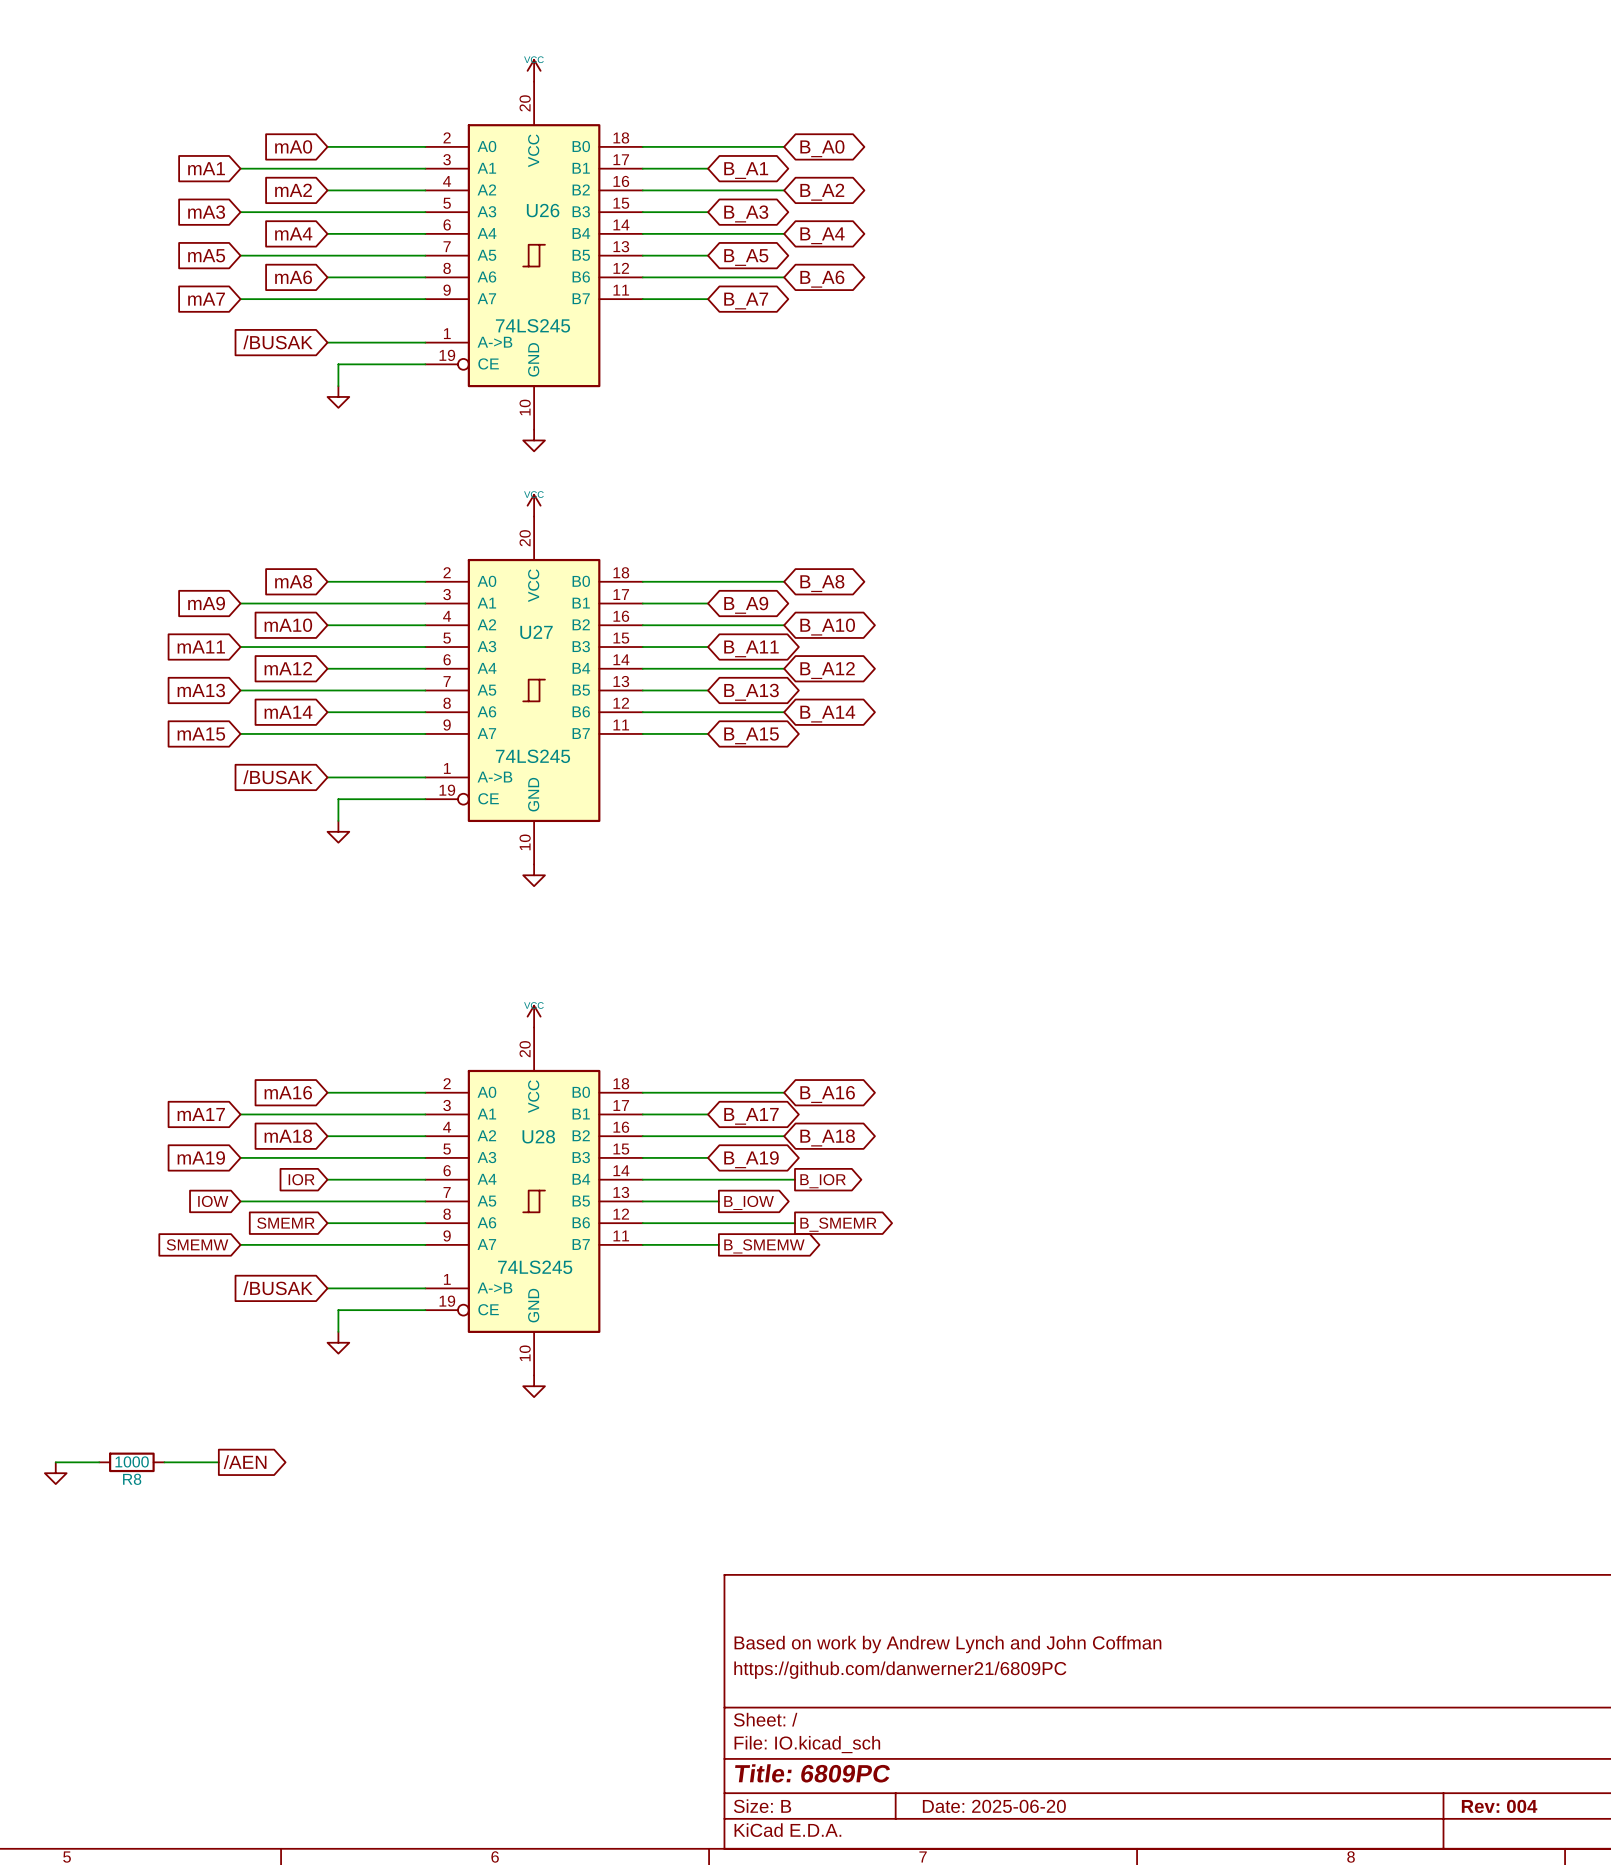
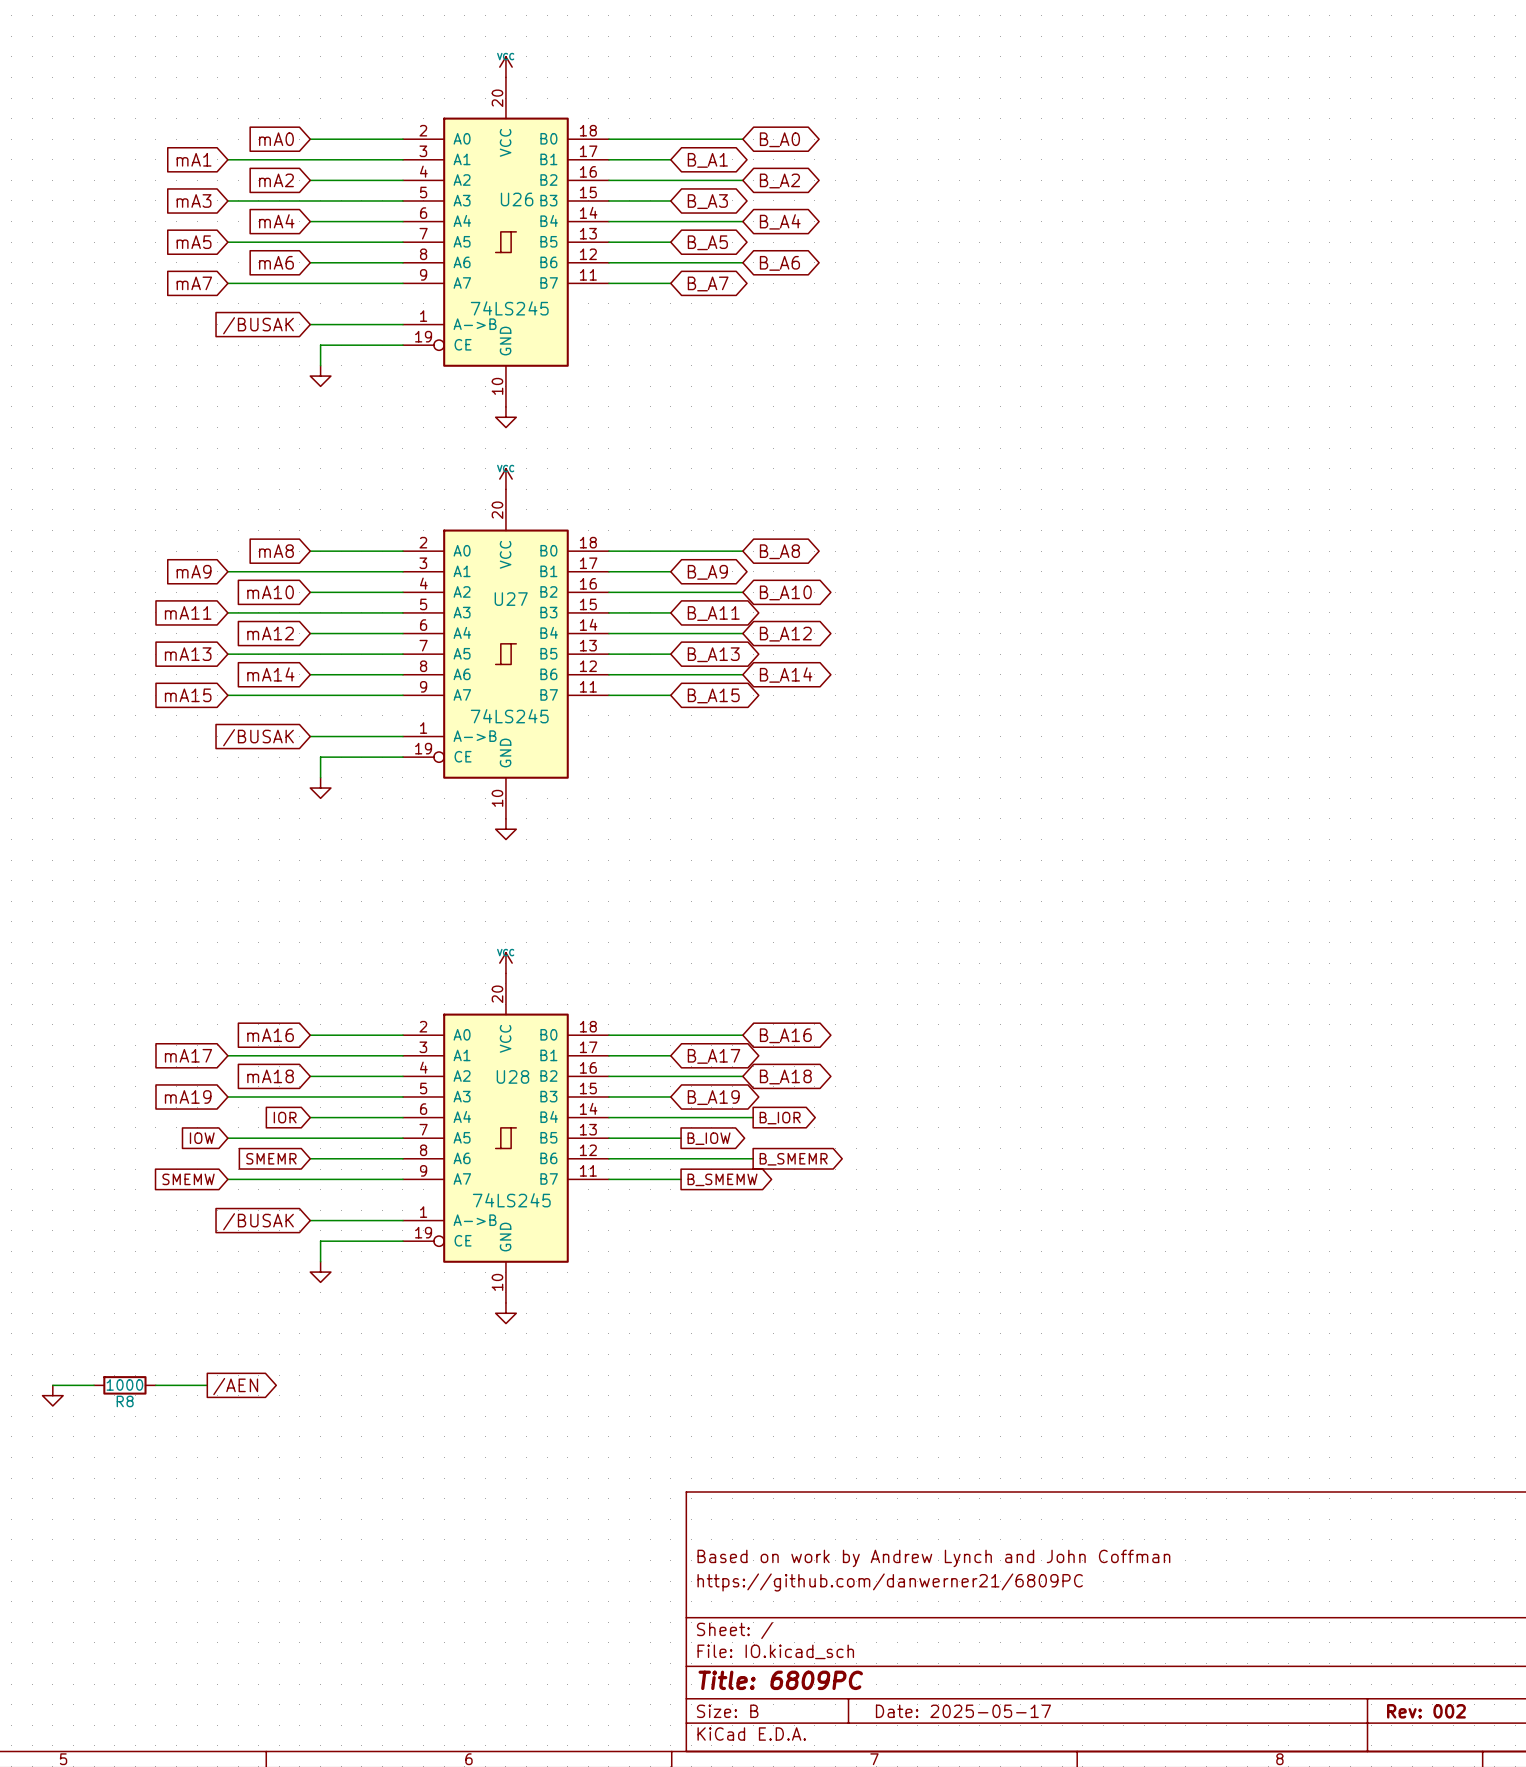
title block: Date: 2025-06-20 (994, 1806) -> Date: 2025-05-17 (963, 1711)
title block: Rev: 004 (1499, 1806) -> Rev: 002 (1426, 1711)

